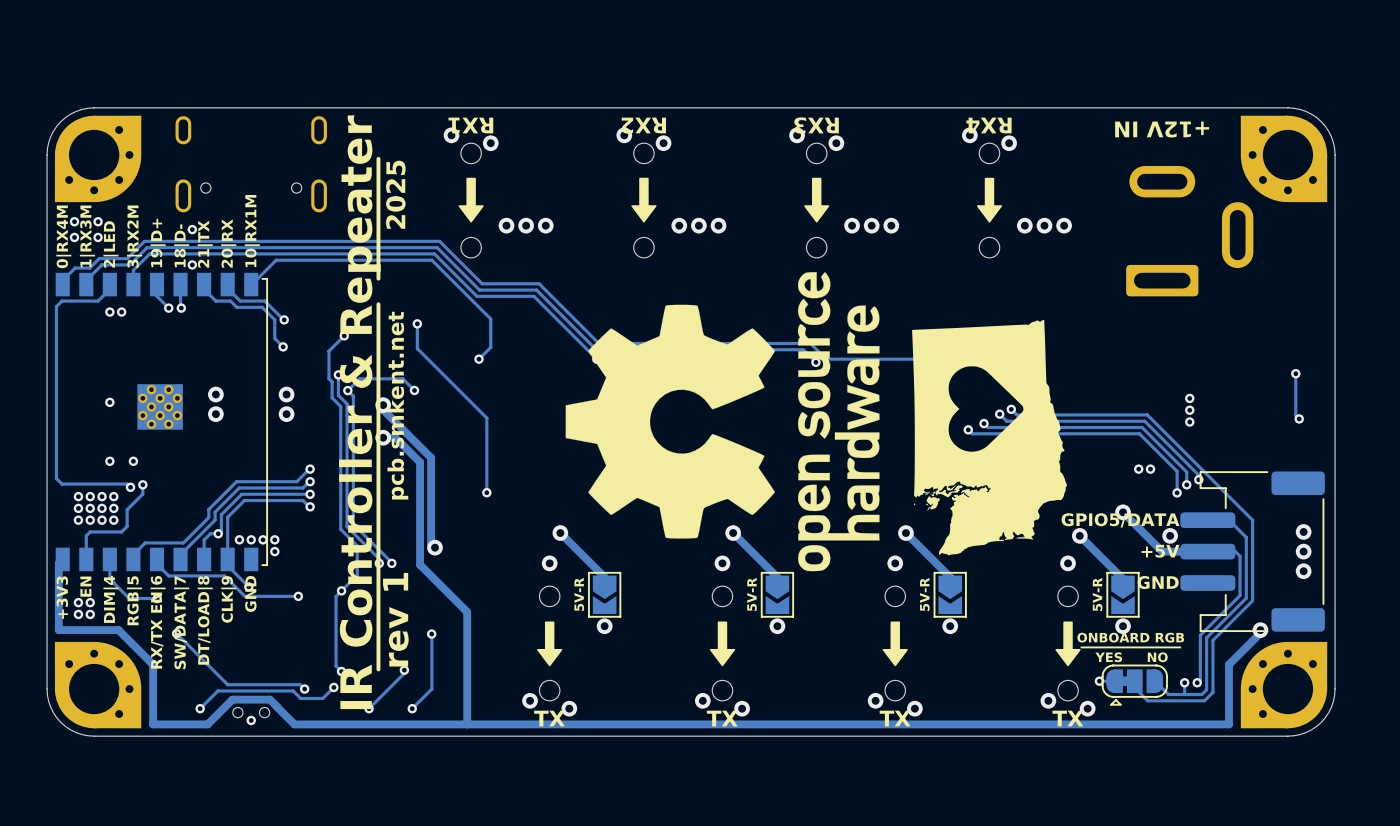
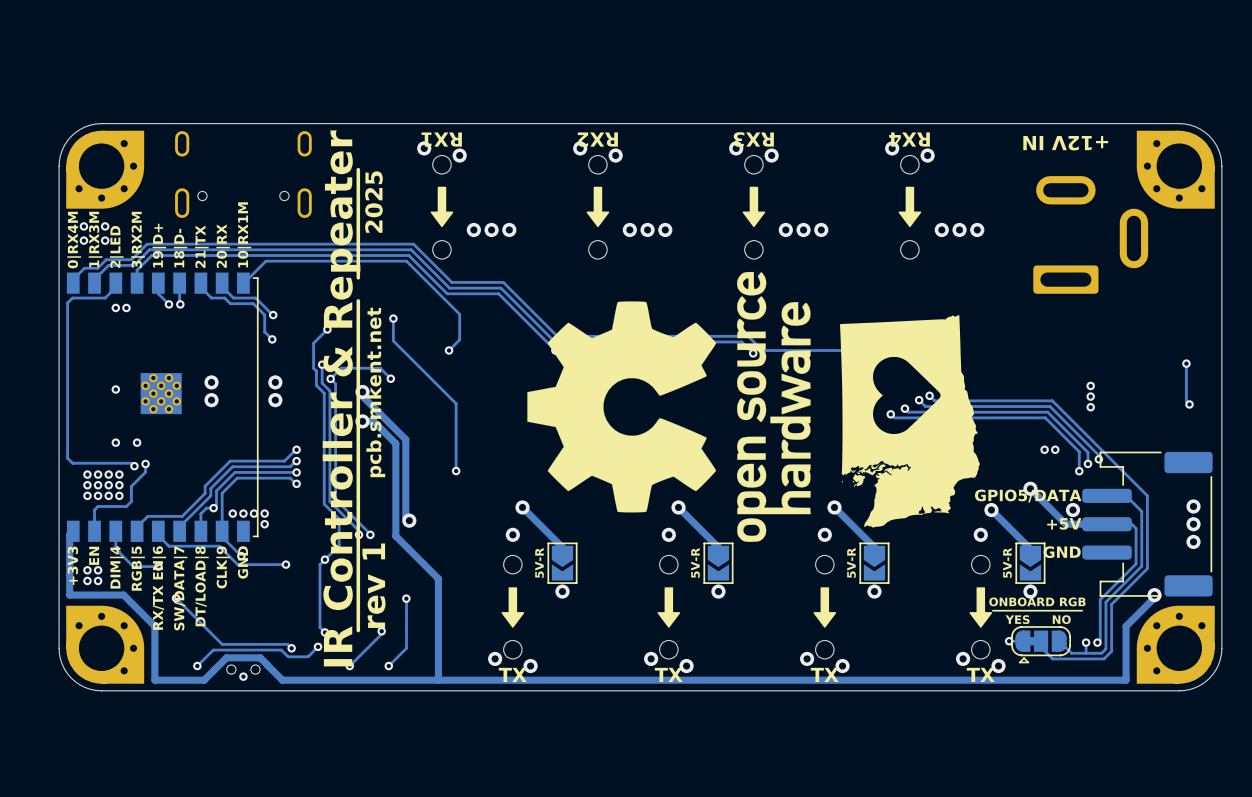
via: (192, 229) -> none
via: (192, 264) -> none

